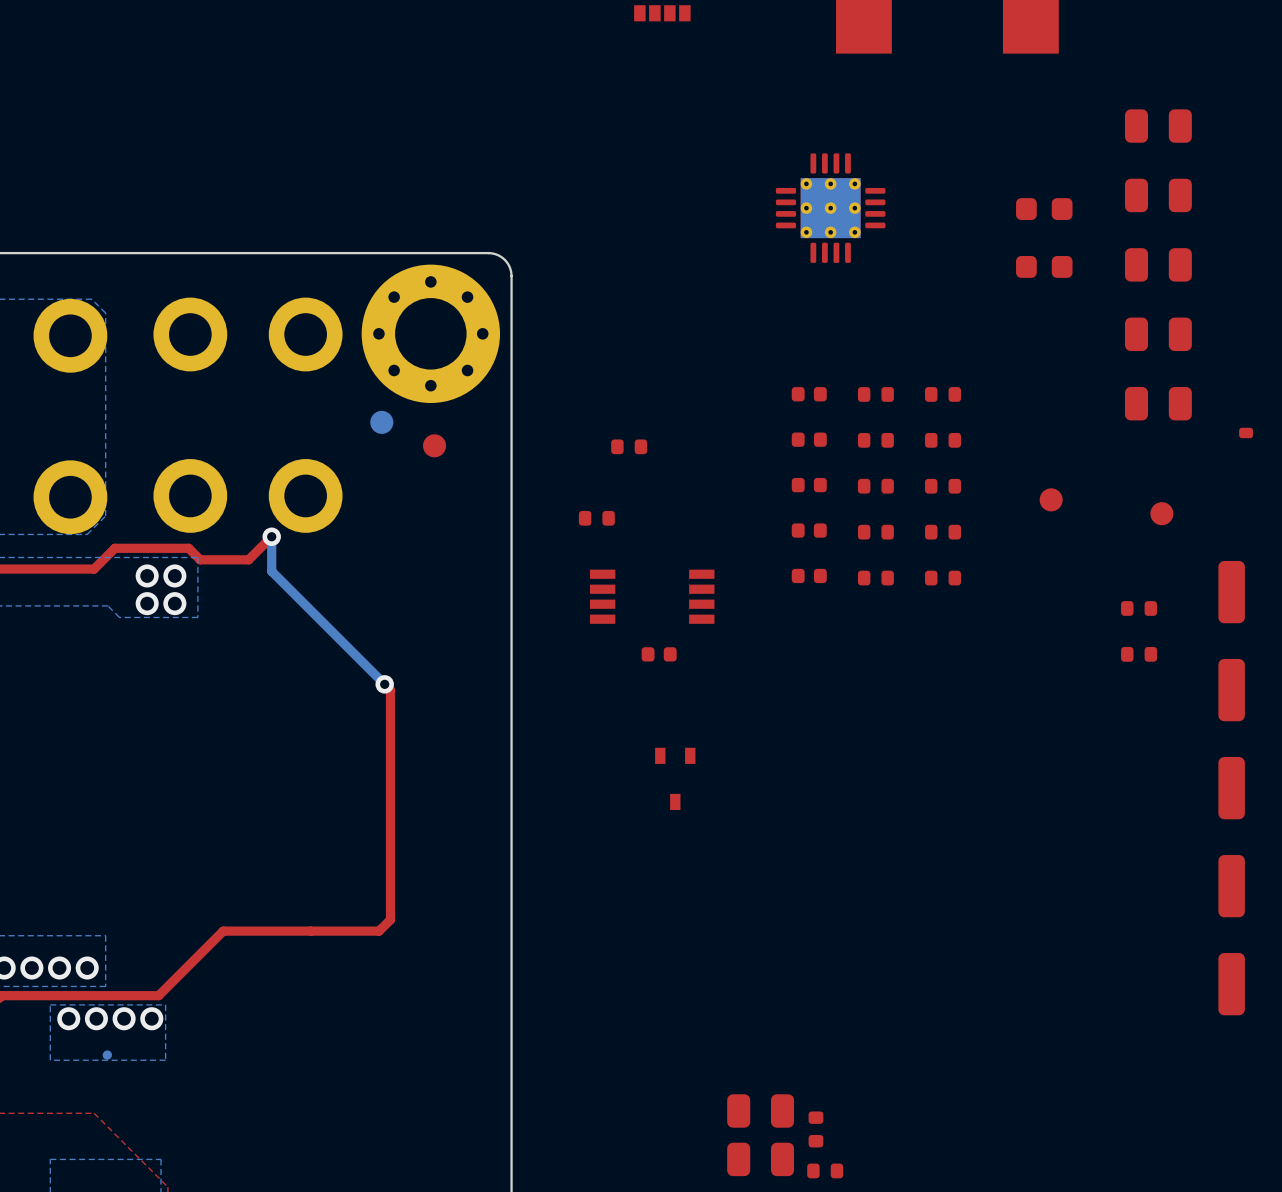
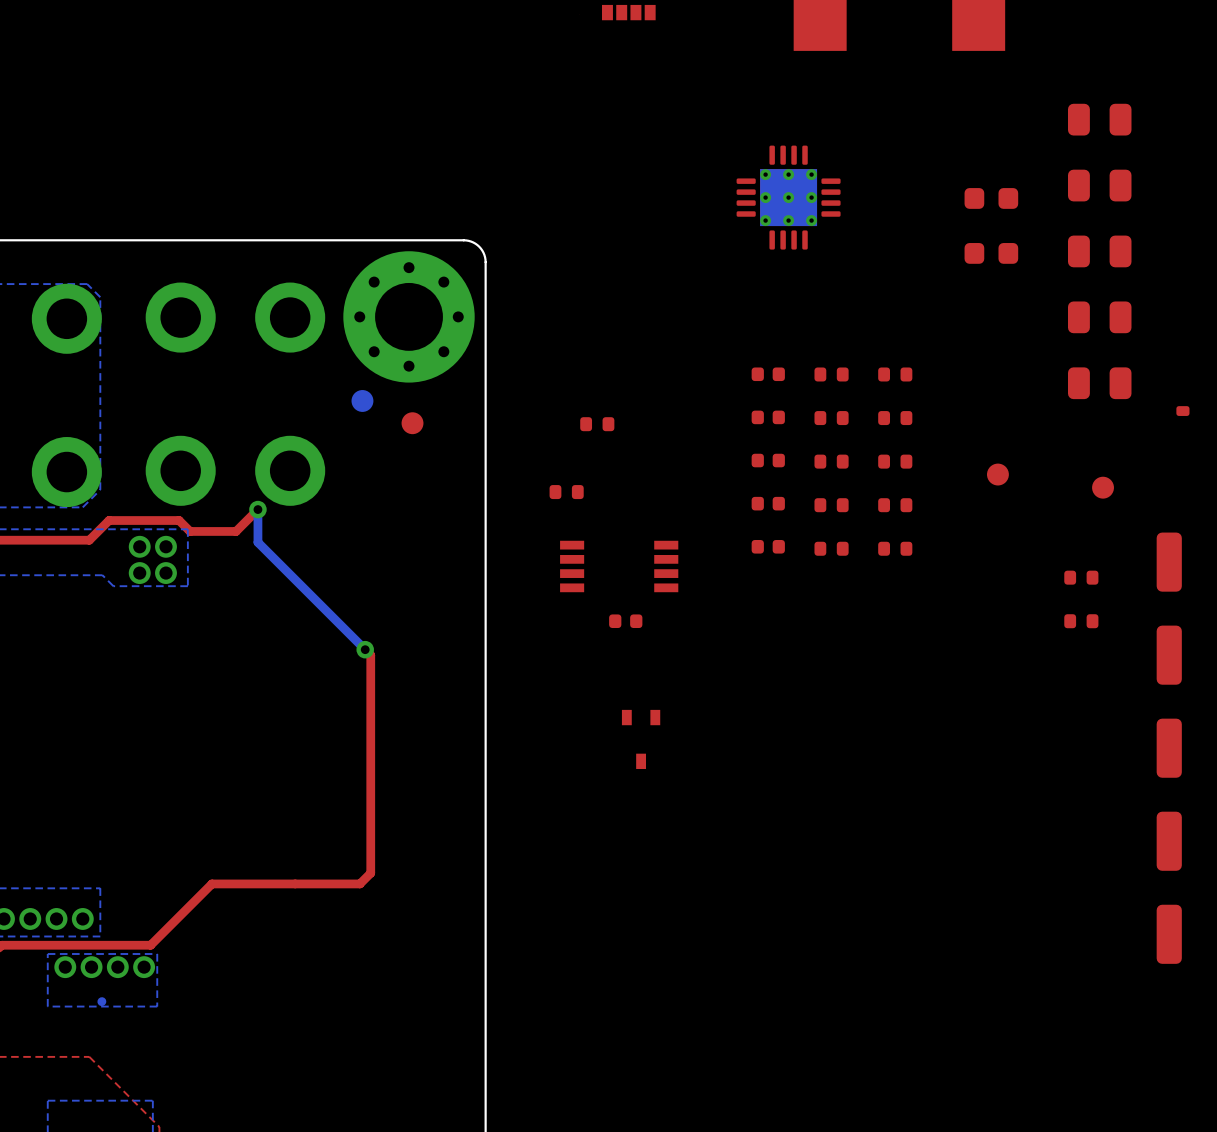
part: (760, 1110) -> none
part: (815, 1129) -> none
part: (760, 1159) -> none
part: (825, 1170) -> none

